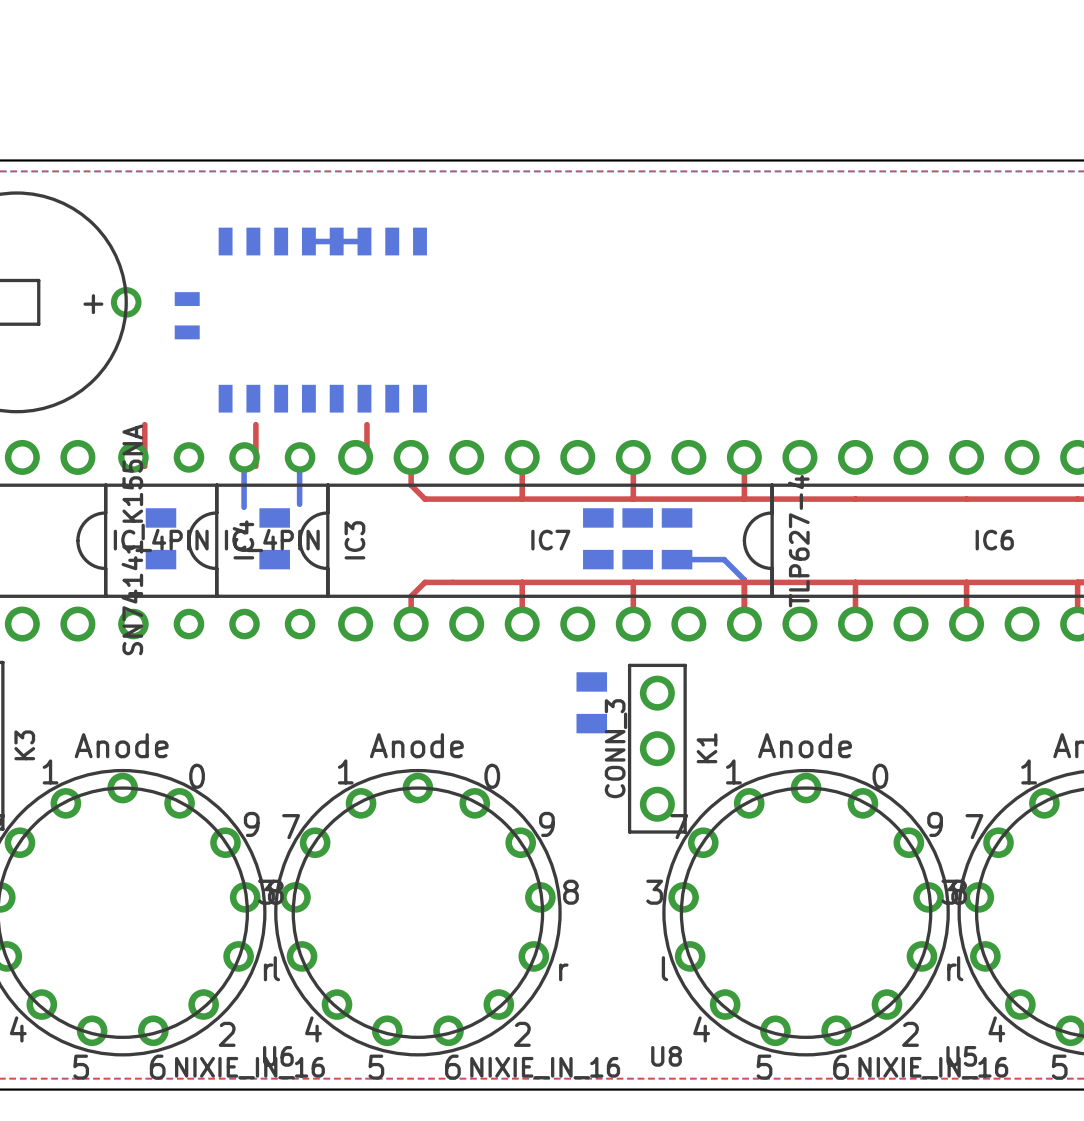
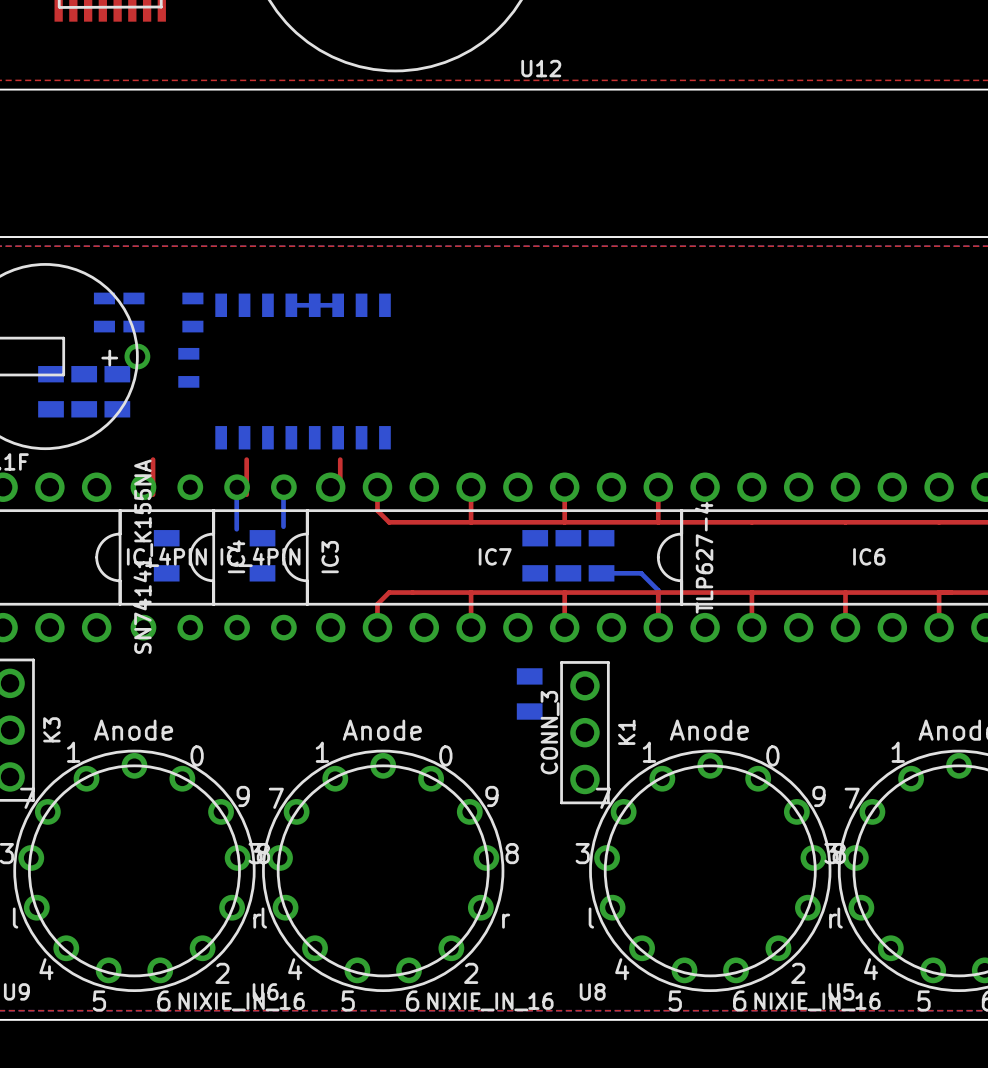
part: none -> (104, 312)
part: none -> (133, 312)
part: none -> (192, 312)
part: none -> (51, 391)
part: none -> (84, 391)
part: none -> (117, 391)

